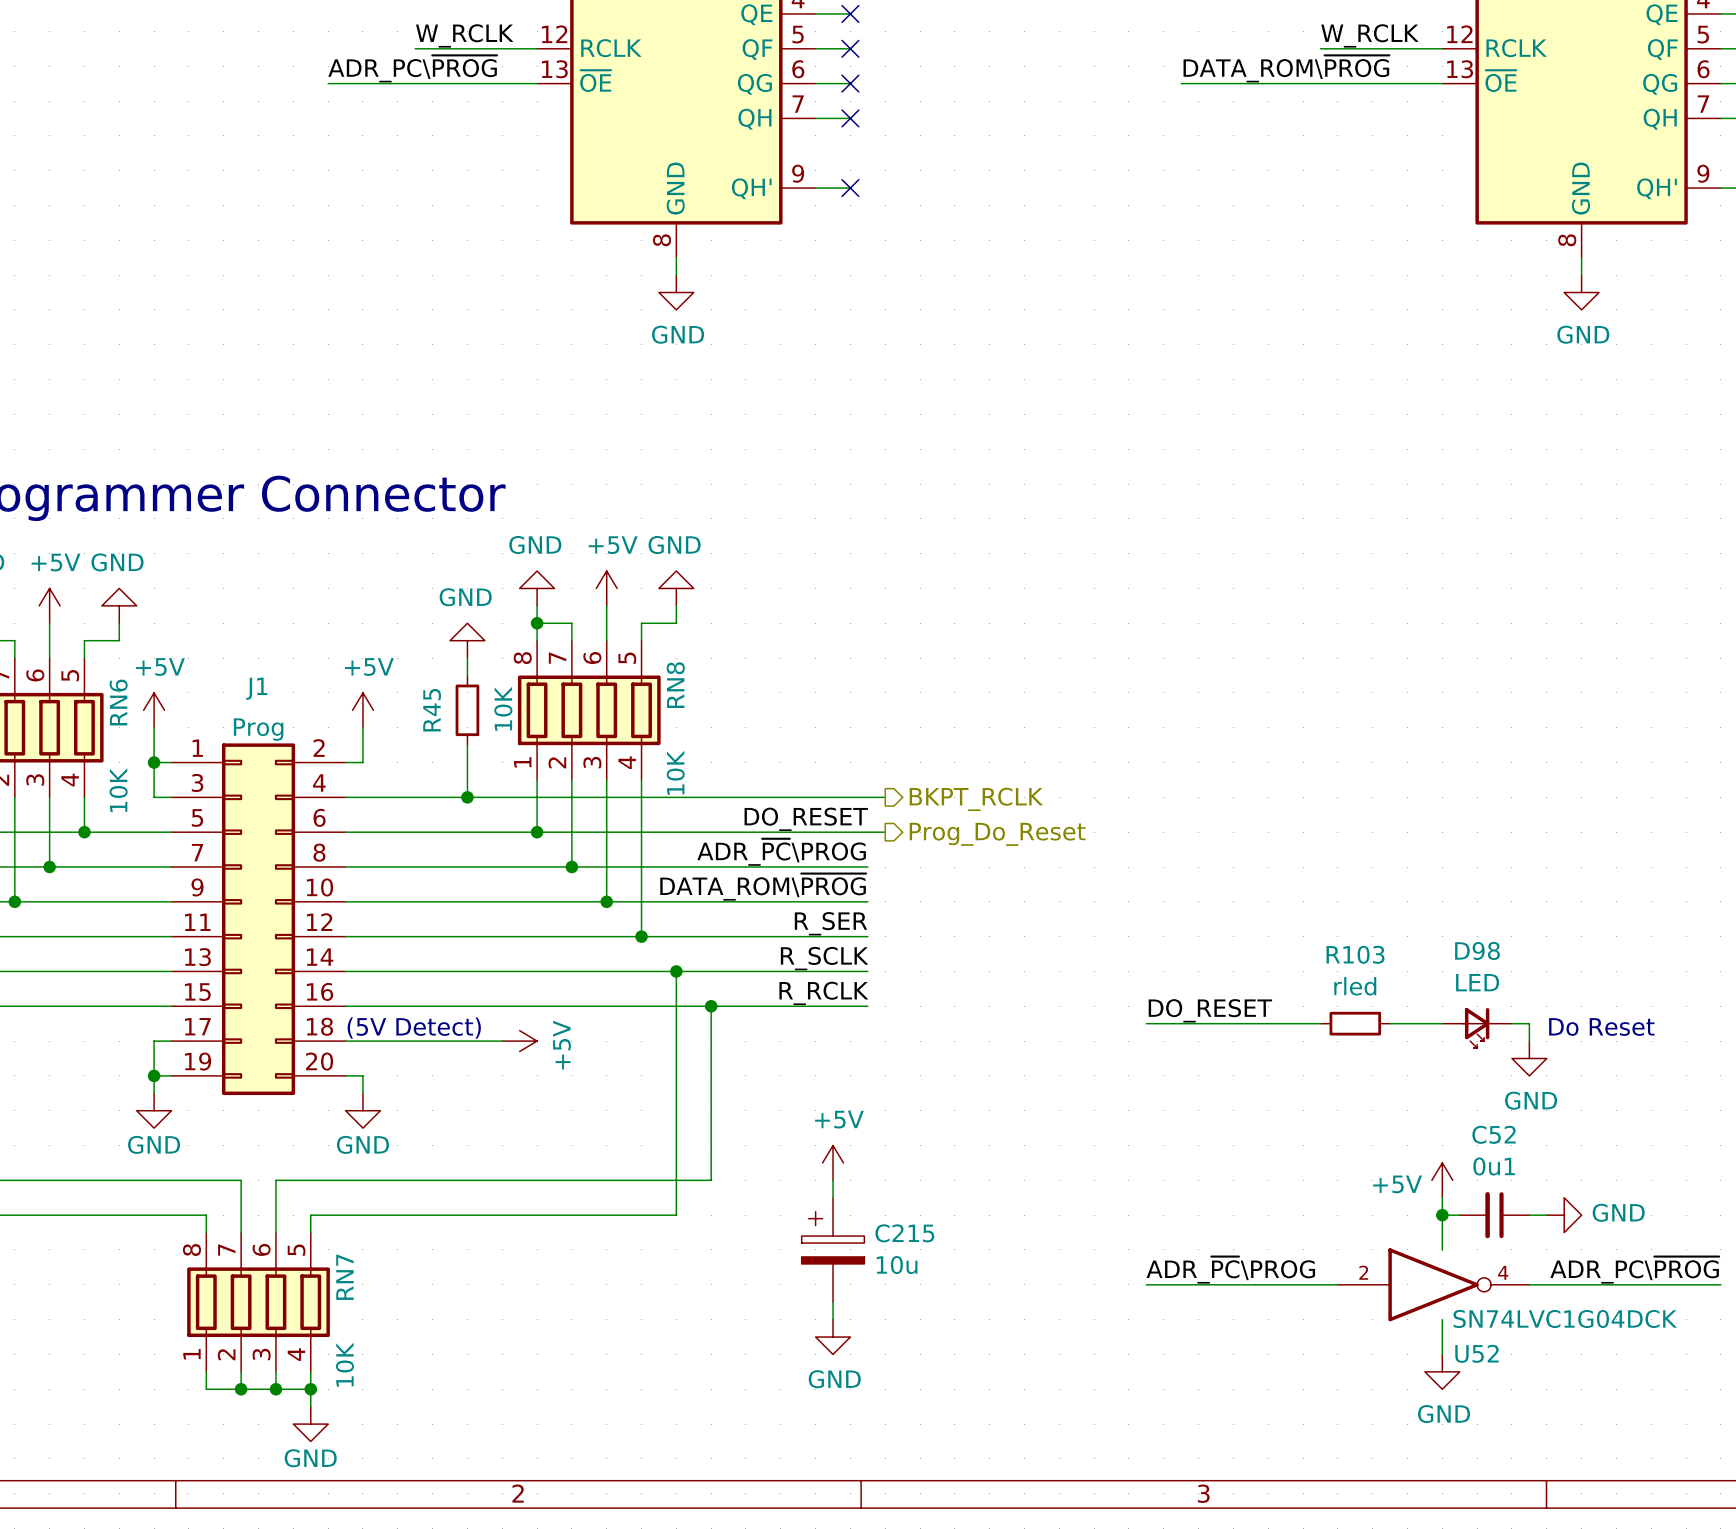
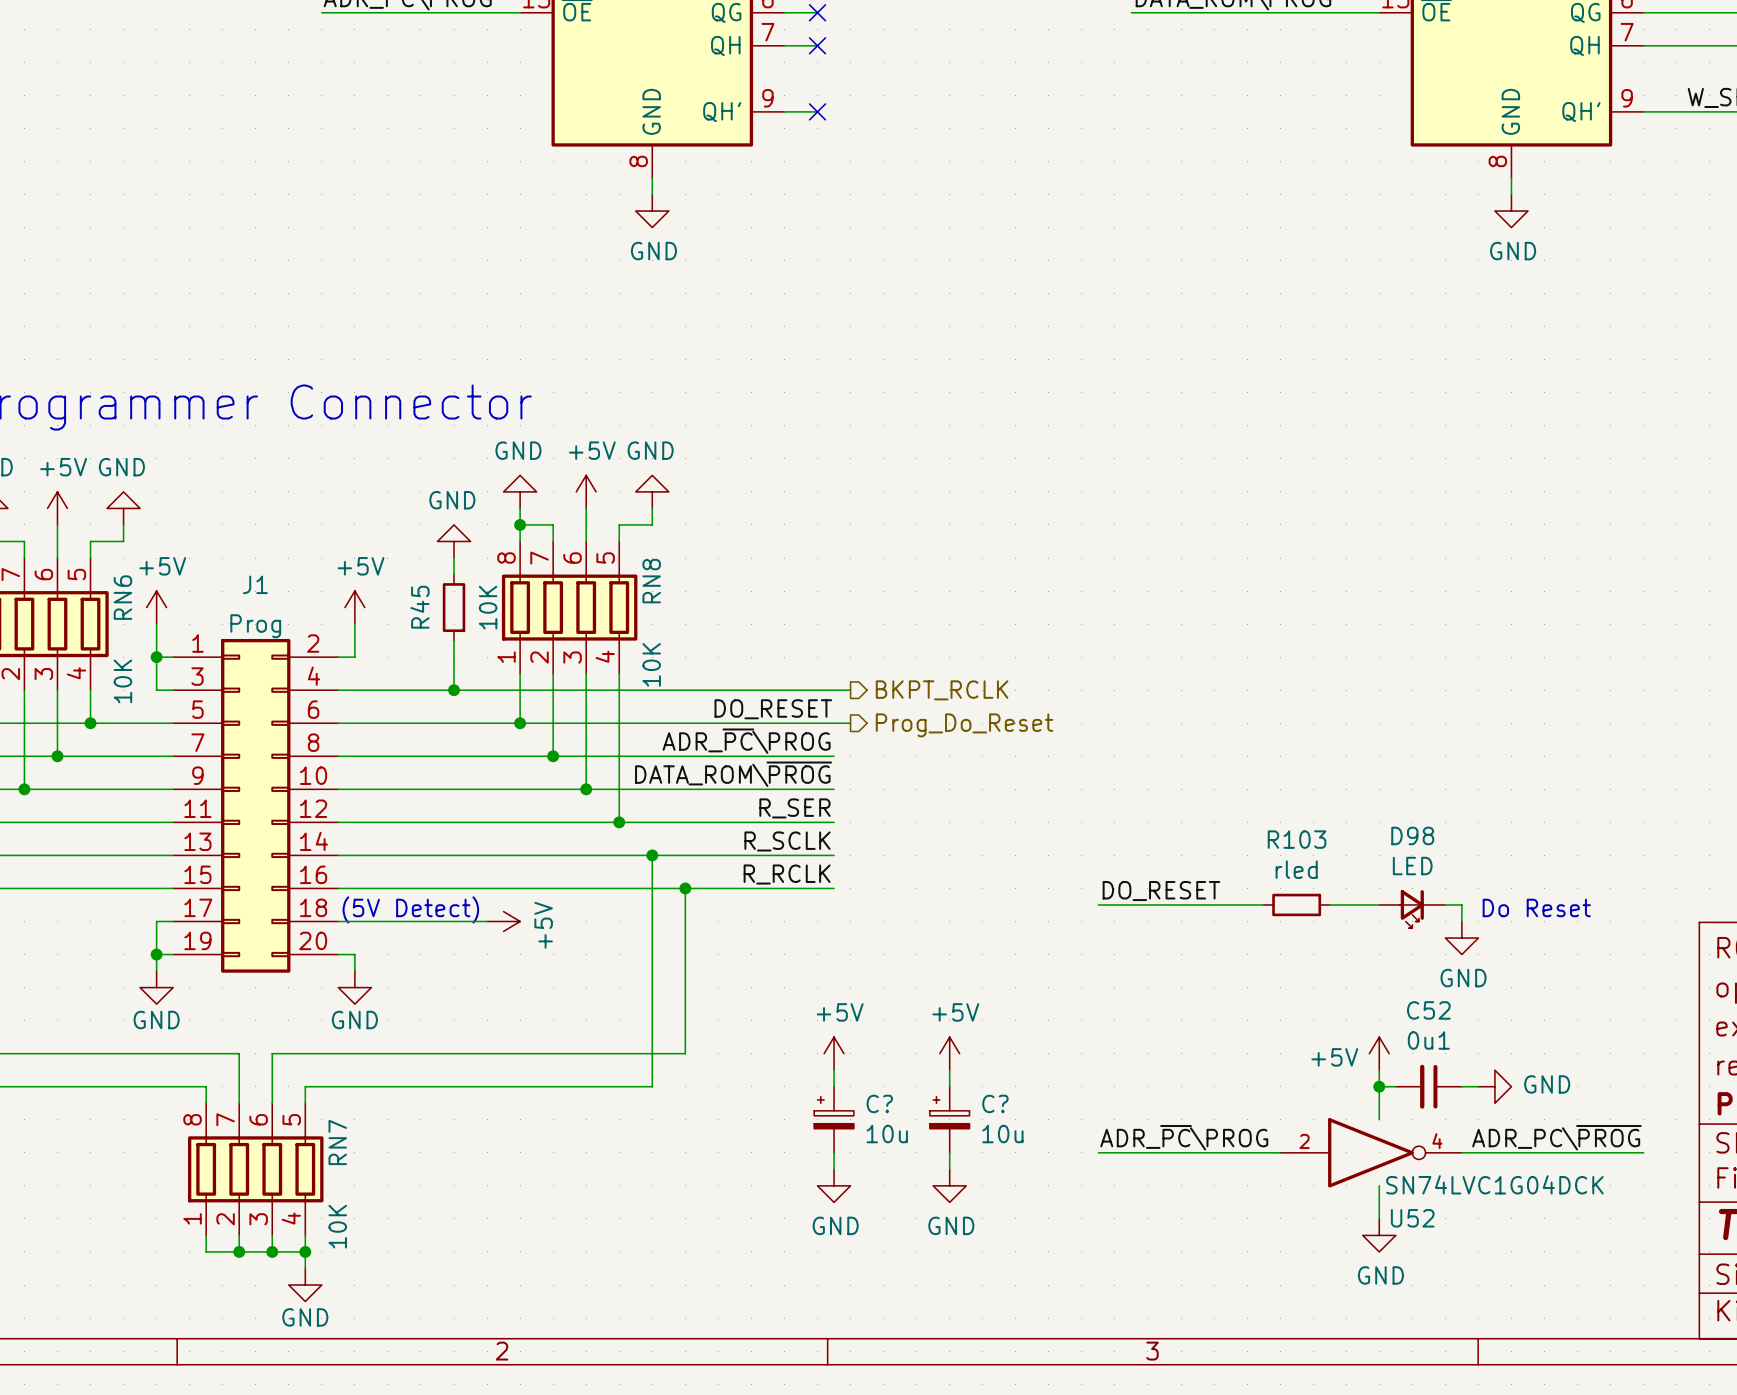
power symbol position: +5V (833, 1162) -> +5V (834, 1053)
wire: (833, 1180) (833, 1197) -> (834, 1070) (834, 1086)
power symbol: none -> +5V (949, 1053)
wire: none -> (949, 1070) (949, 1086)
C215: 10u (833, 1249) -> none
C?: none -> 10u (834, 1119)
C?: none -> 10u (949, 1119)
wire: none -> (949, 1152) (949, 1169)
wire: (833, 1302) (833, 1319) -> (834, 1152) (834, 1169)
power symbol: none -> GND (949, 1185)
power symbol position: GND (833, 1337) -> GND (834, 1185)

